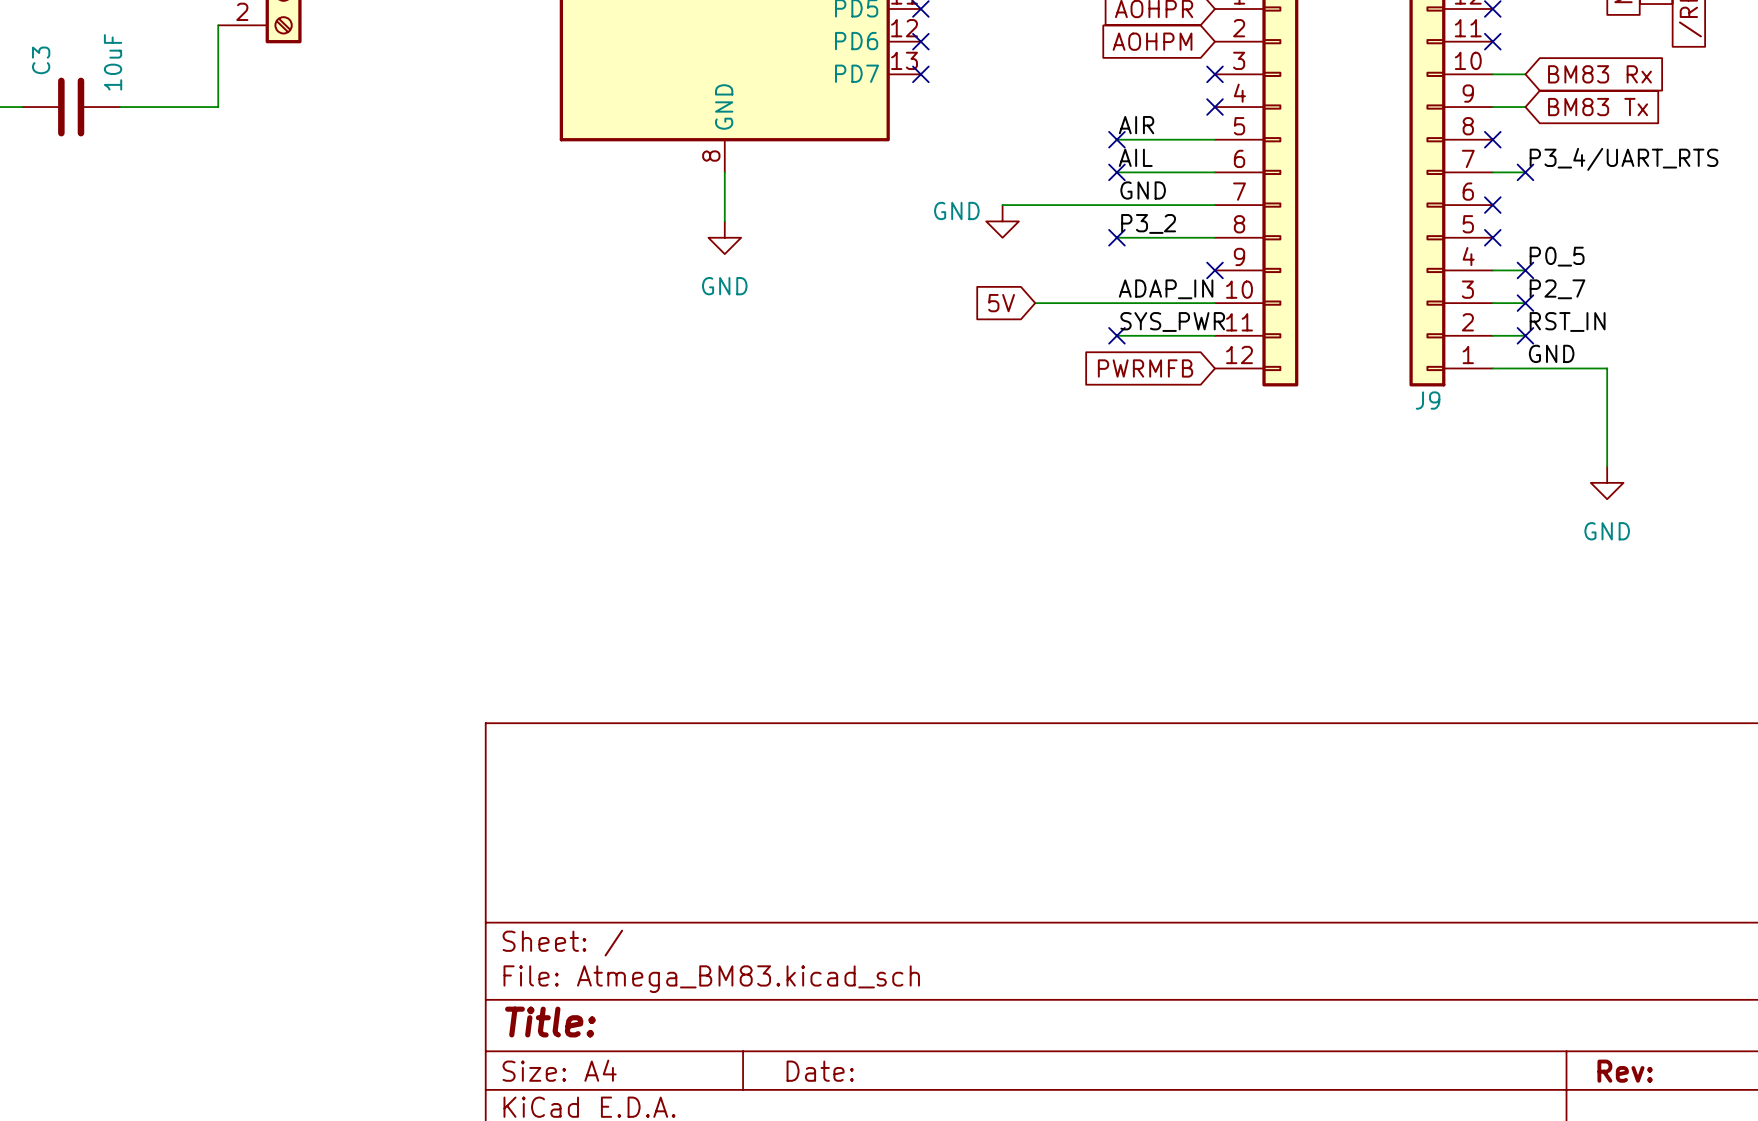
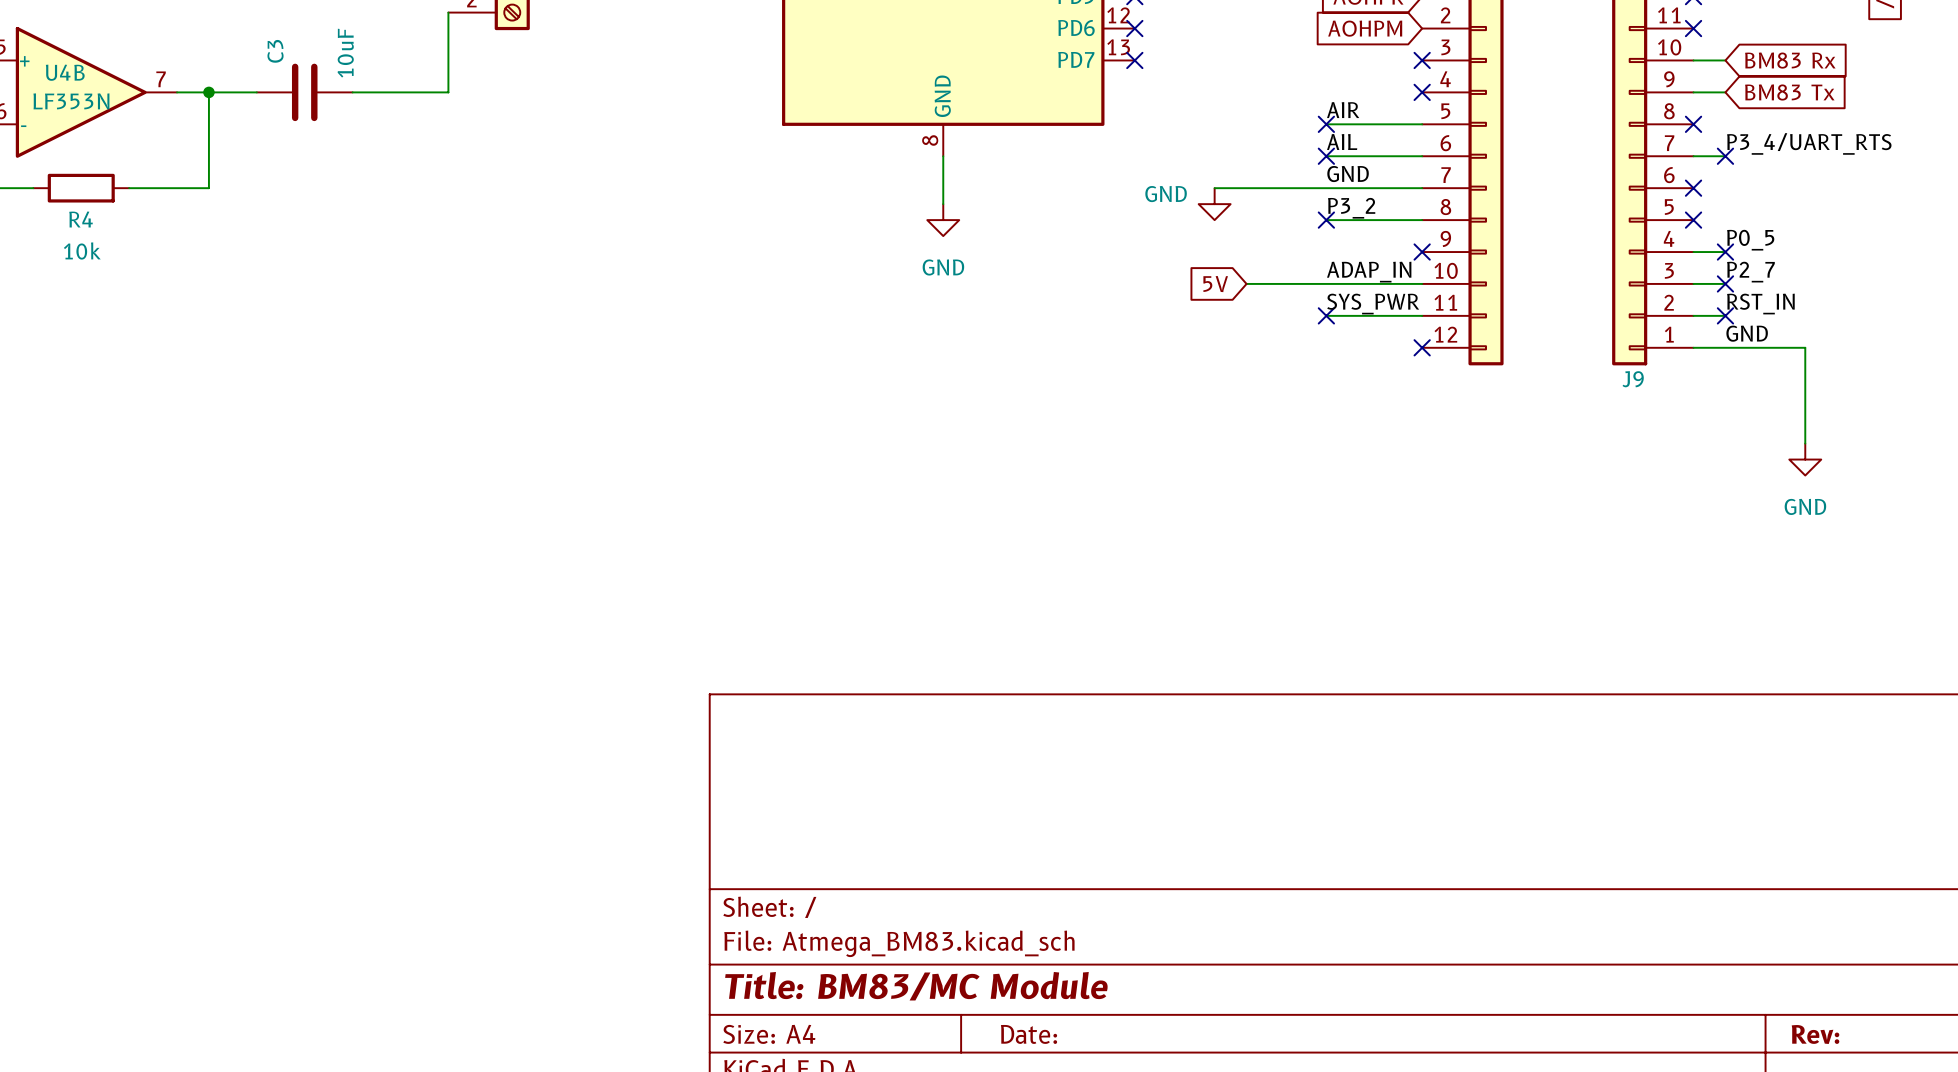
global label: PWRMFB (1145, 368) -> none
no-connect mark: none -> (1422, 347)
title block: Title: (550, 1022) -> Title: BM83/MC Module (916, 986)

